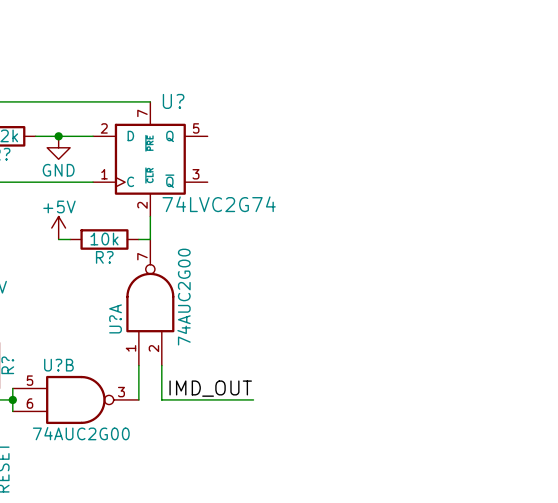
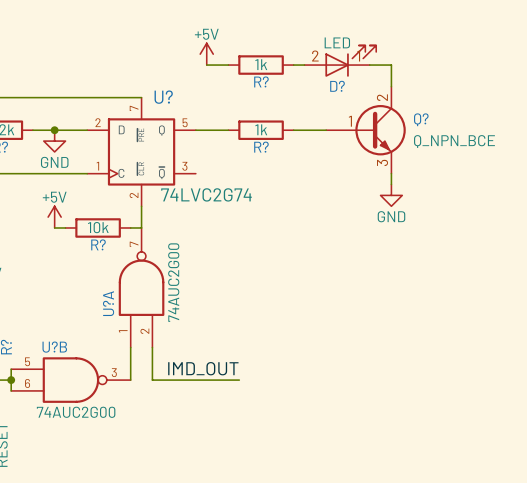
power symbol: none -> +5V (206, 54)
D?: none -> LED (340, 61)
wire: none -> (206, 65) (228, 65)
R?: none -> 1k (261, 65)
wire: none -> (293, 65) (304, 65)
wire: none -> (369, 65) (391, 65) (391, 86)
wire: none -> (195, 130) (228, 130)
R?: none -> 1k (261, 130)
wire: none -> (293, 130) (326, 130)
Q?: none -> Q_NPN_BCE (365, 130)
wire: none -> (391, 173) (391, 184)
power symbol: none -> GND (391, 195)

